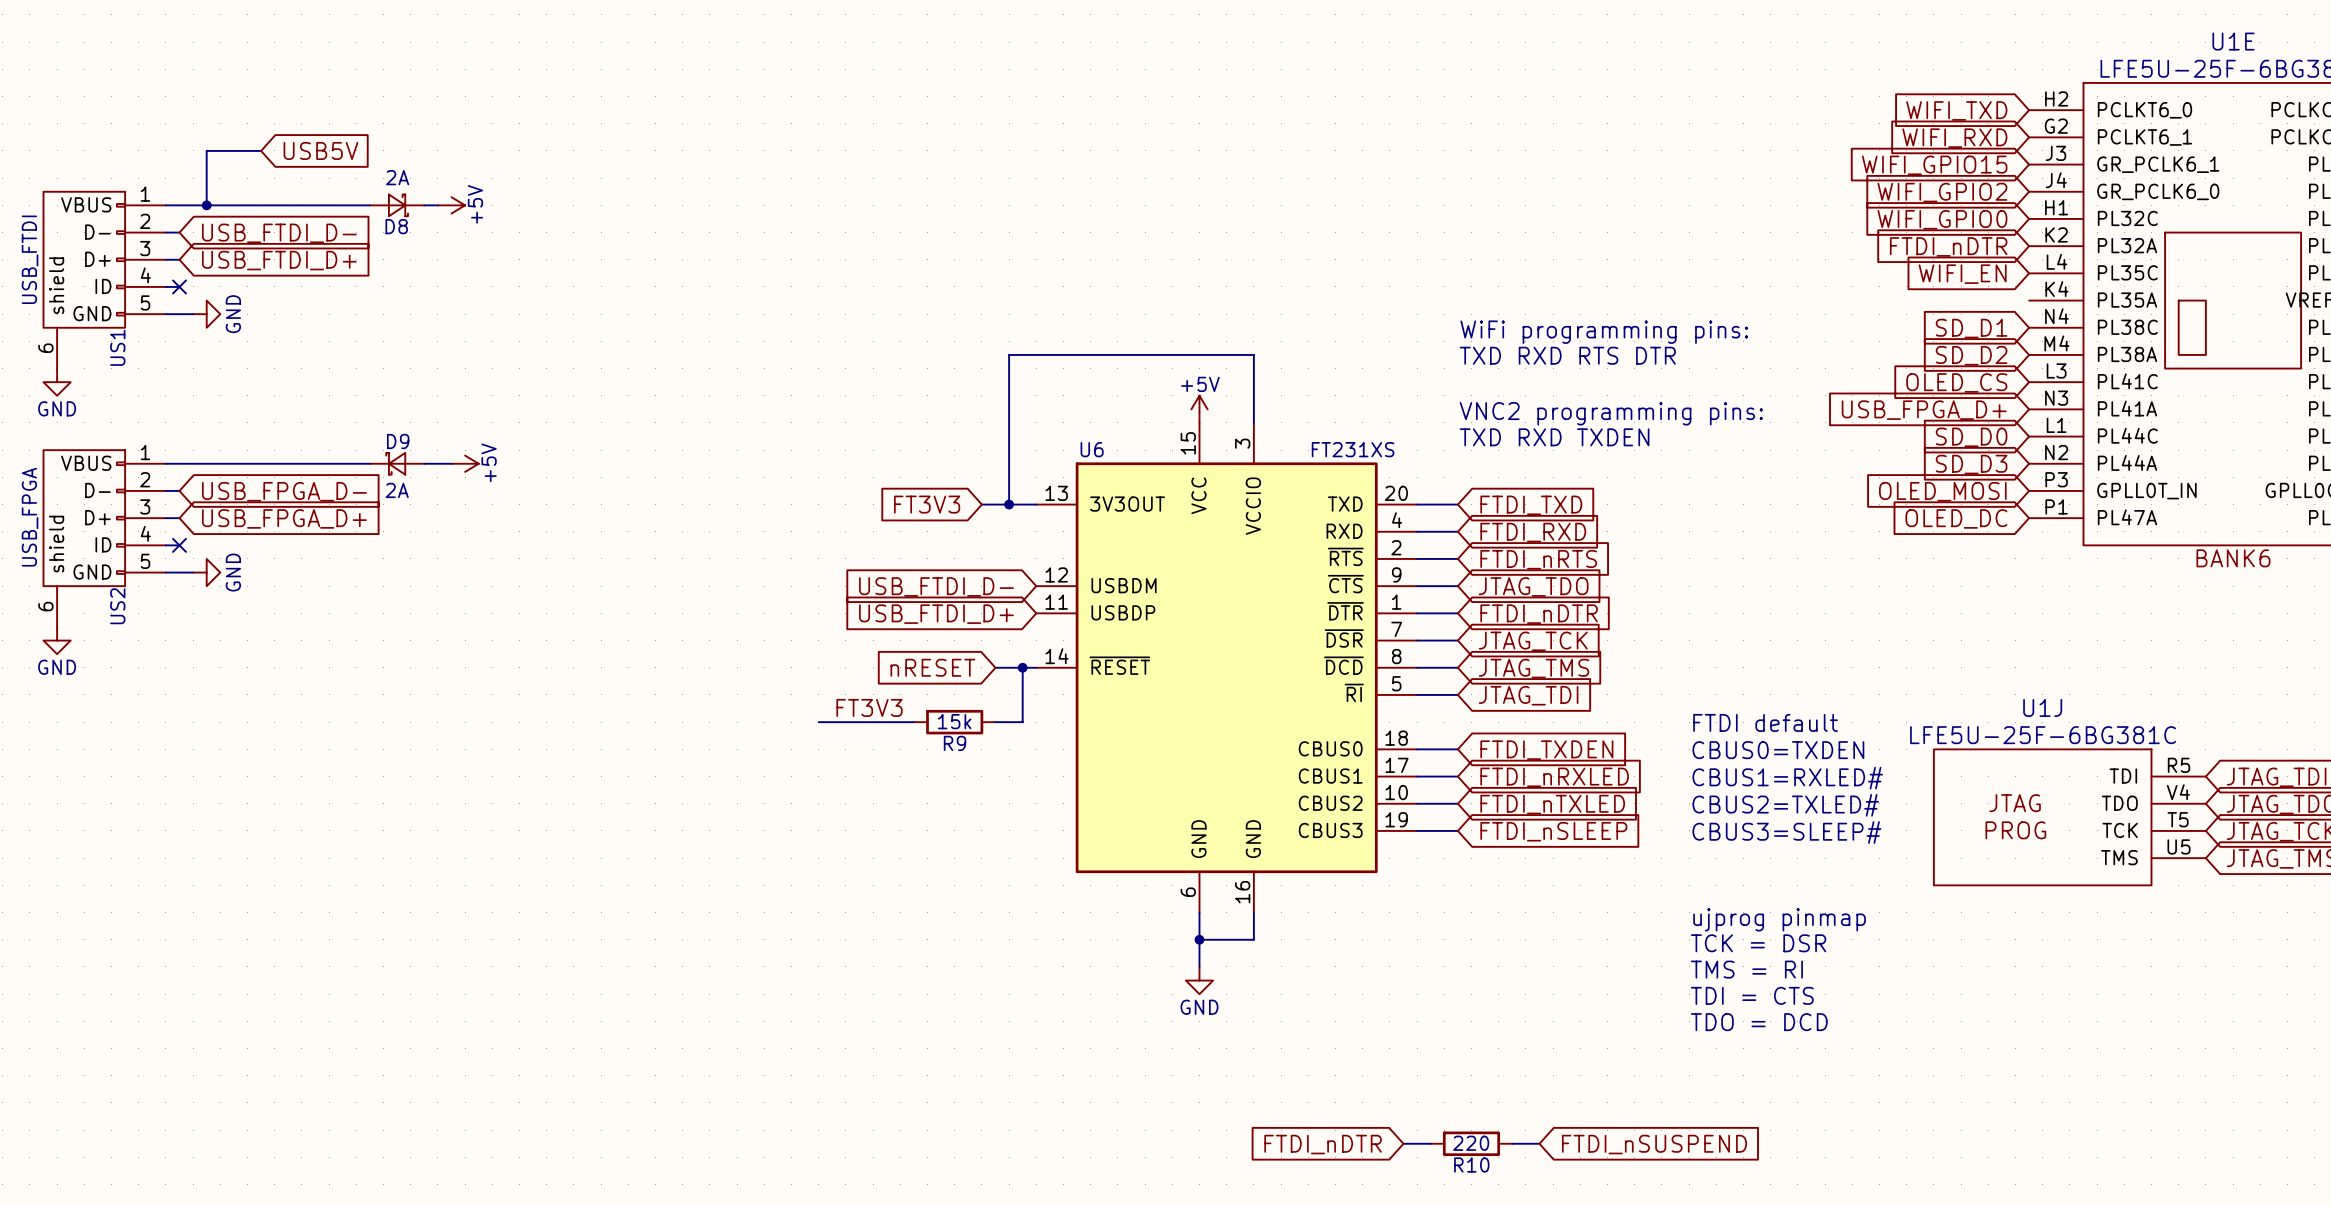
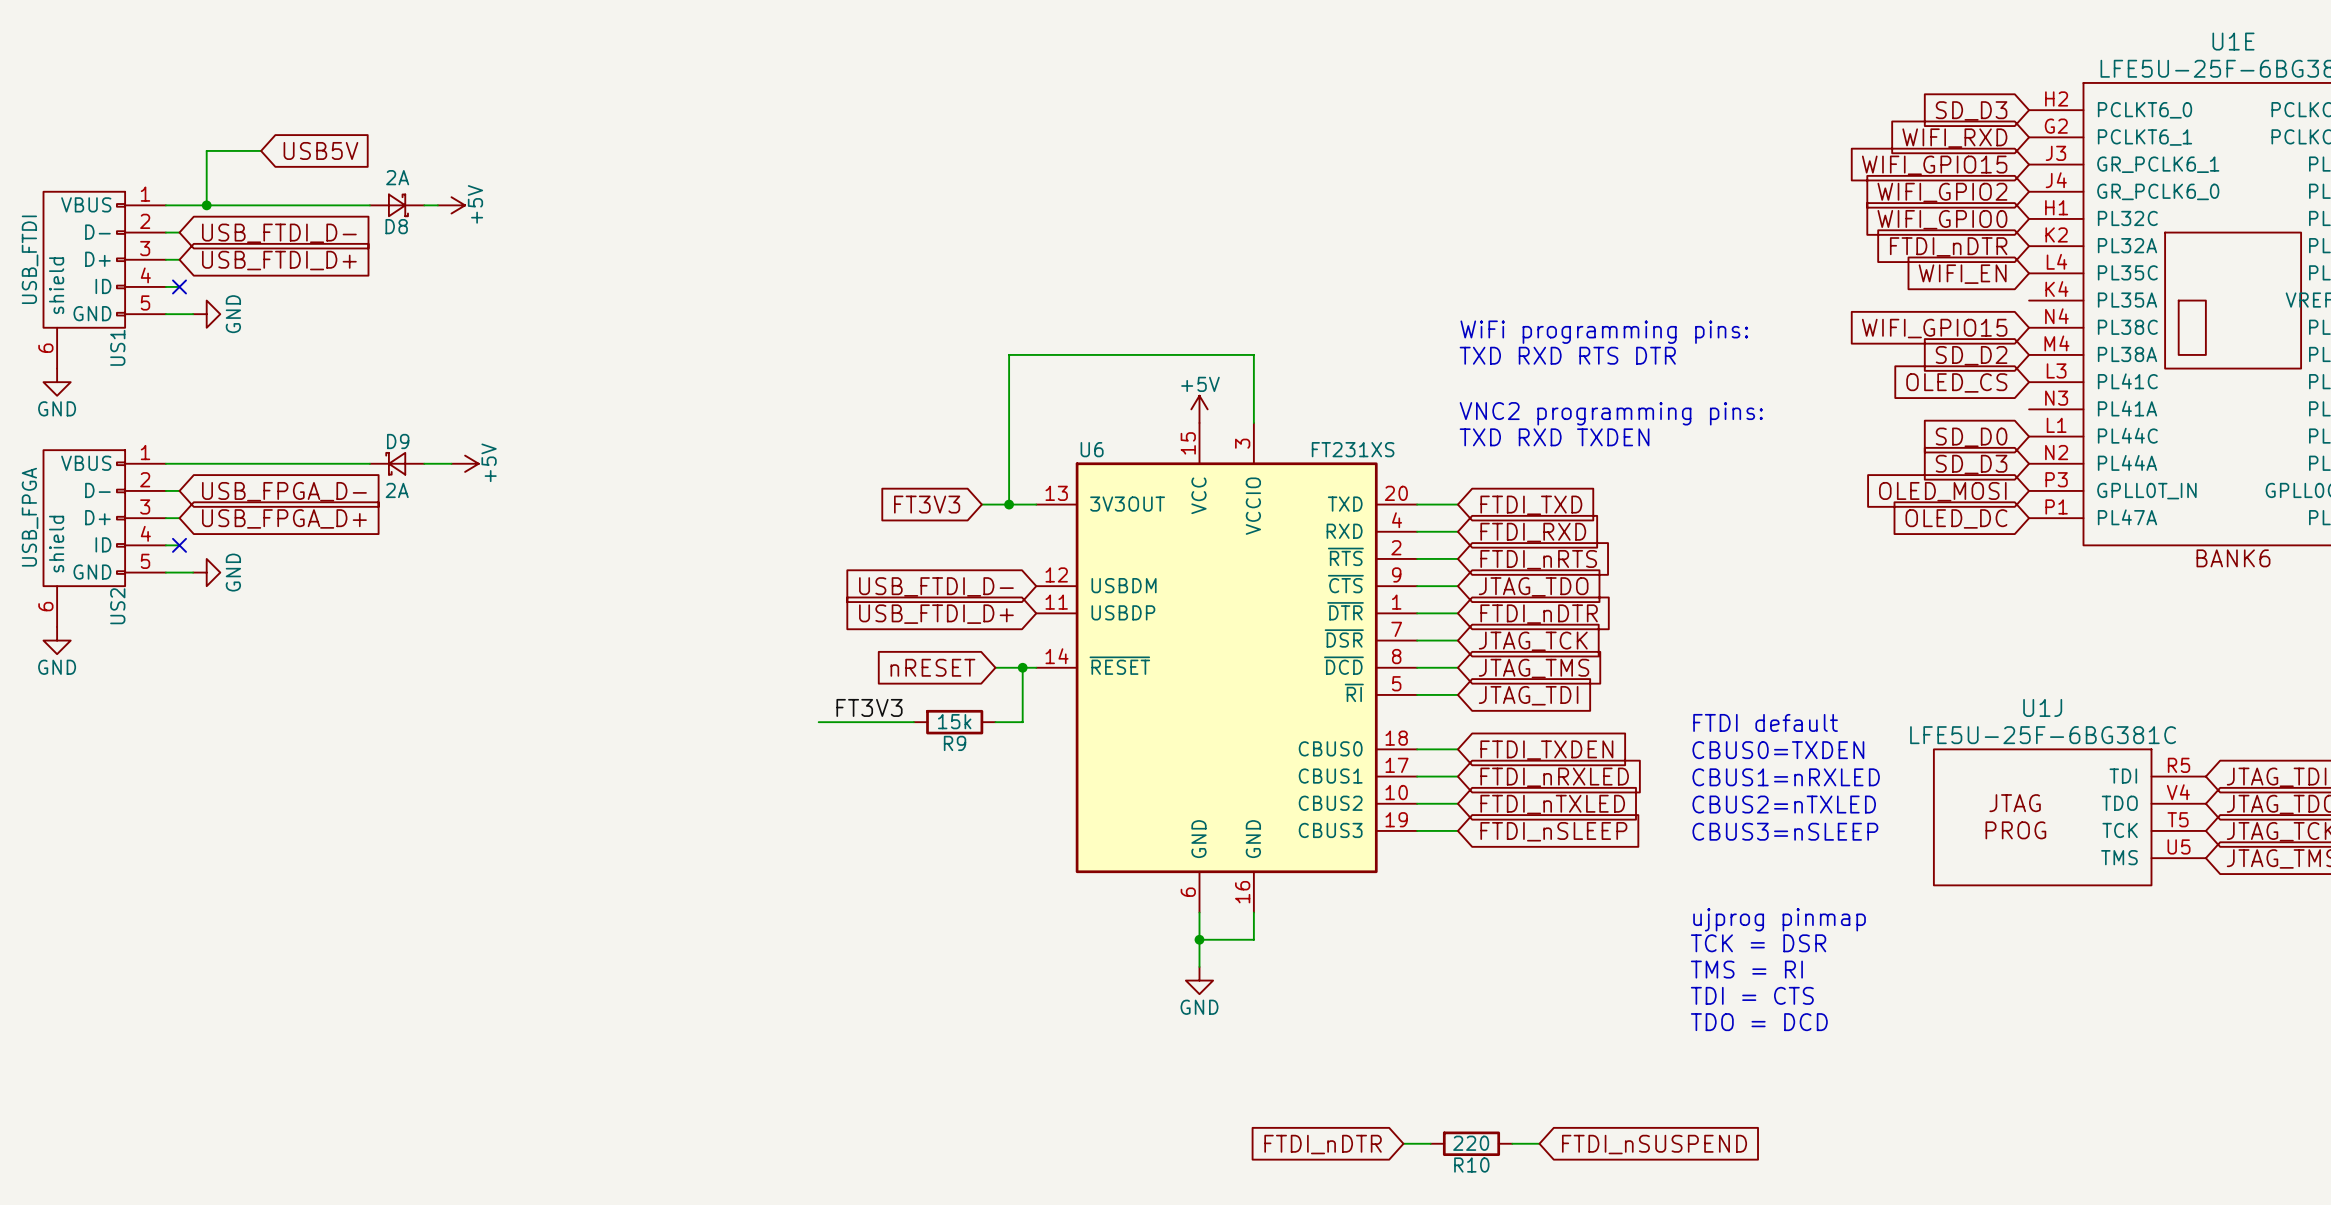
global label: WIFI_TXD (1956, 110) -> SD_D3 (1971, 110)
global label: SD_D1 (1971, 328) -> WIFI_GPIO15 (1934, 328)
global label: USB_FPGA_D+ (1924, 410) -> none
text: CBUS1=RXLED# (1787, 778) -> CBUS1=nRXLED (1786, 777)
text: CBUS2=TXLED# (1785, 805) -> CBUS2=nTXLED (1784, 804)
text: CBUS3=SLEEP# (1786, 832) -> CBUS3=nSLEEP (1785, 831)

